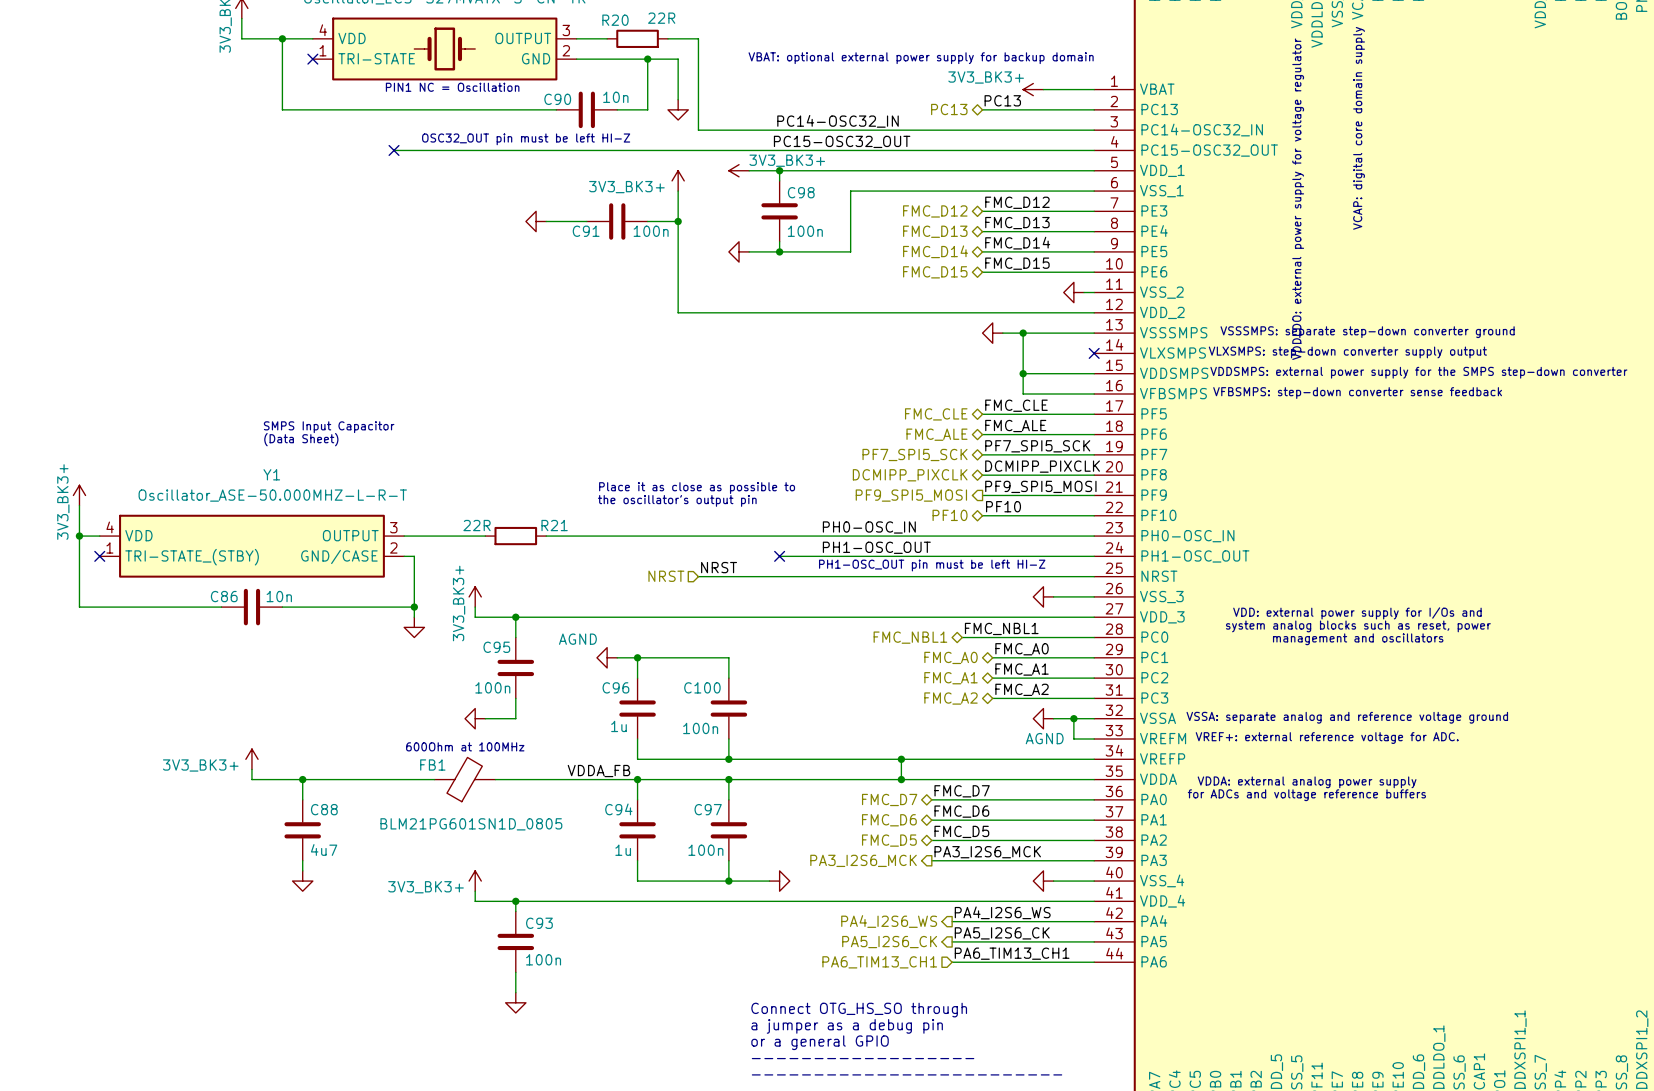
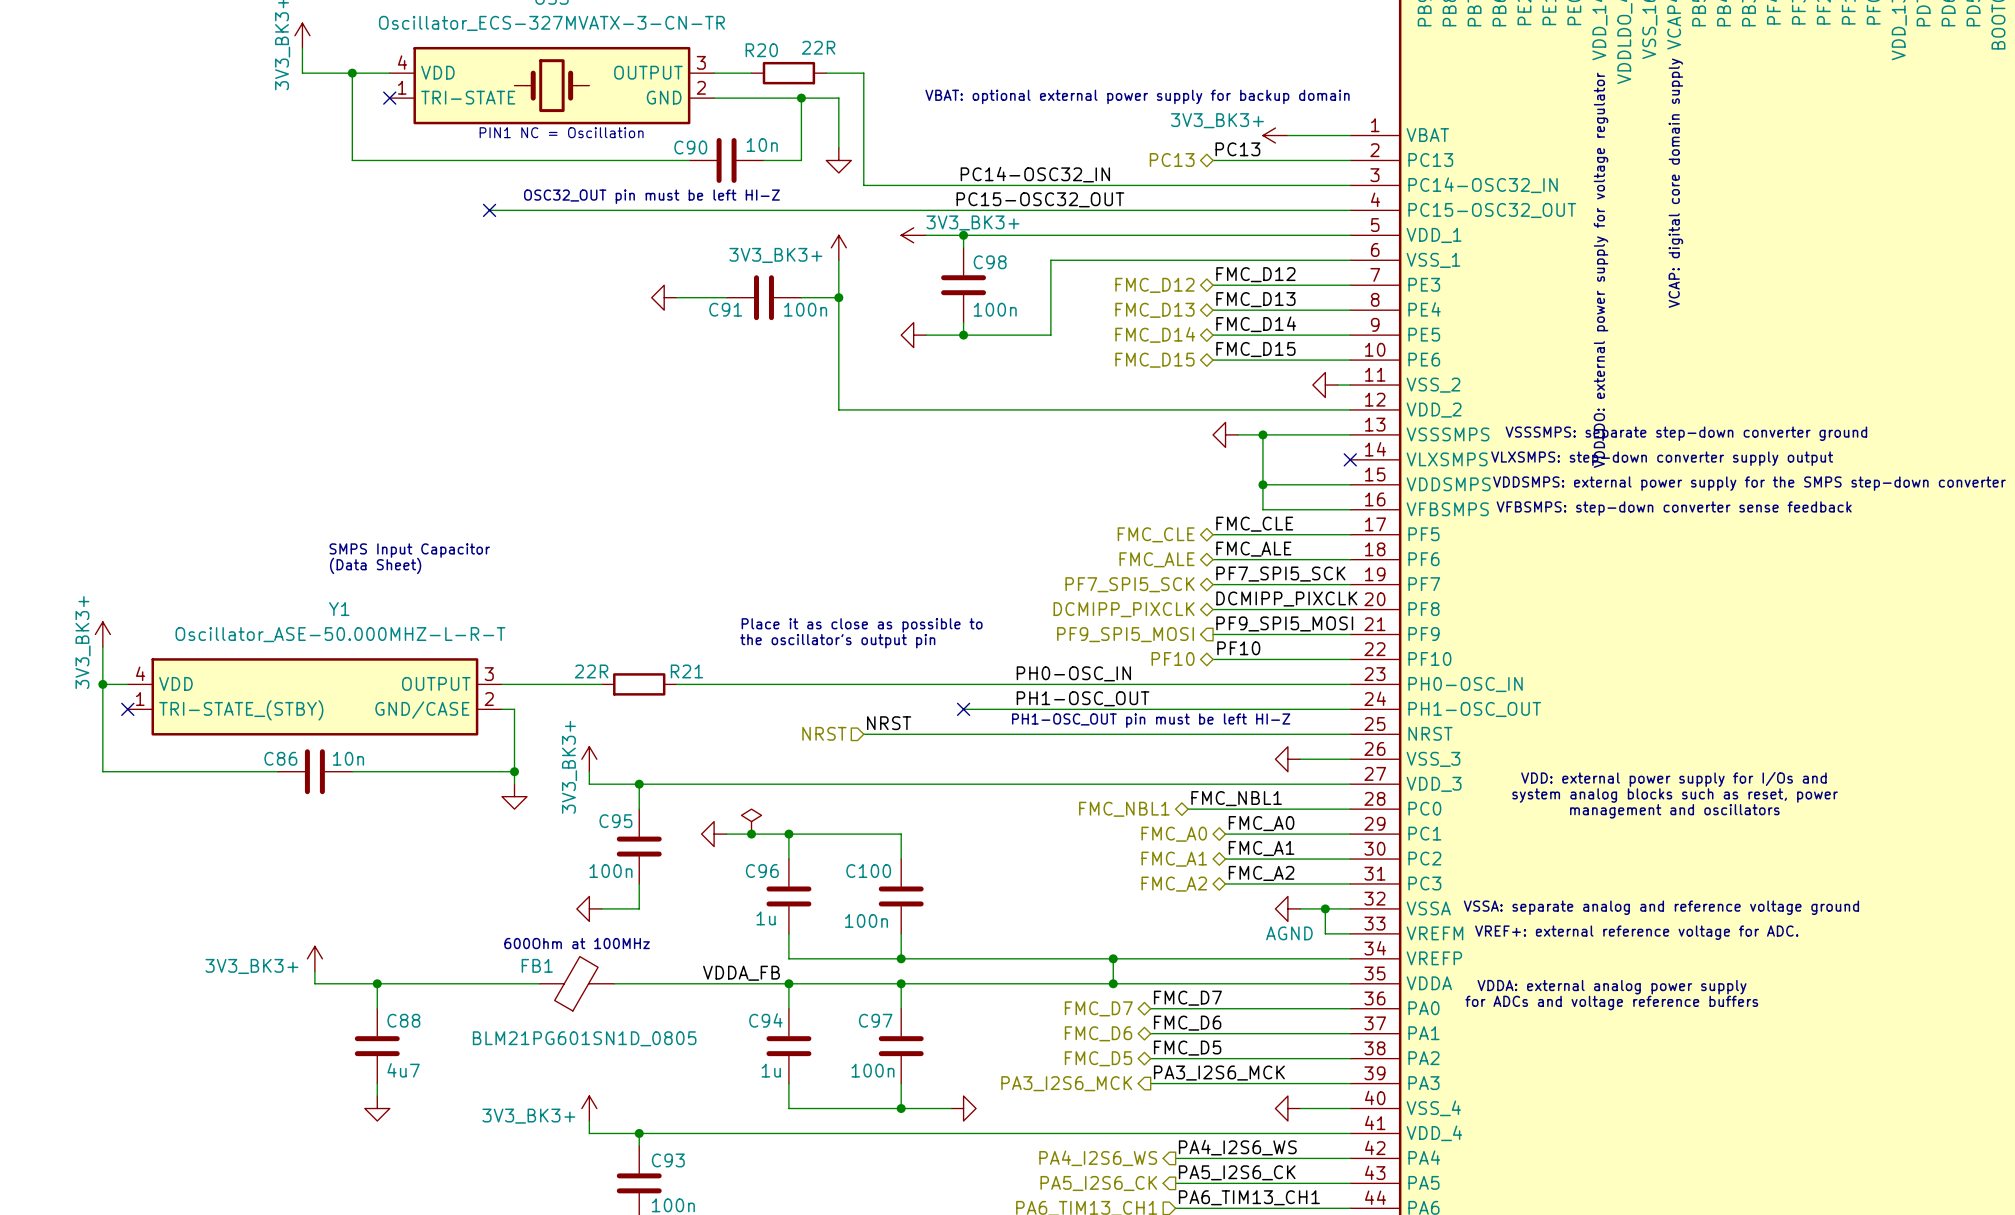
power symbol: none -> (751, 821)
power symbol: none -> (714, 834)
wire: none -> (726, 834) (763, 834)
power symbol: AGND (607, 657) -> none
junction: none -> (751, 834)

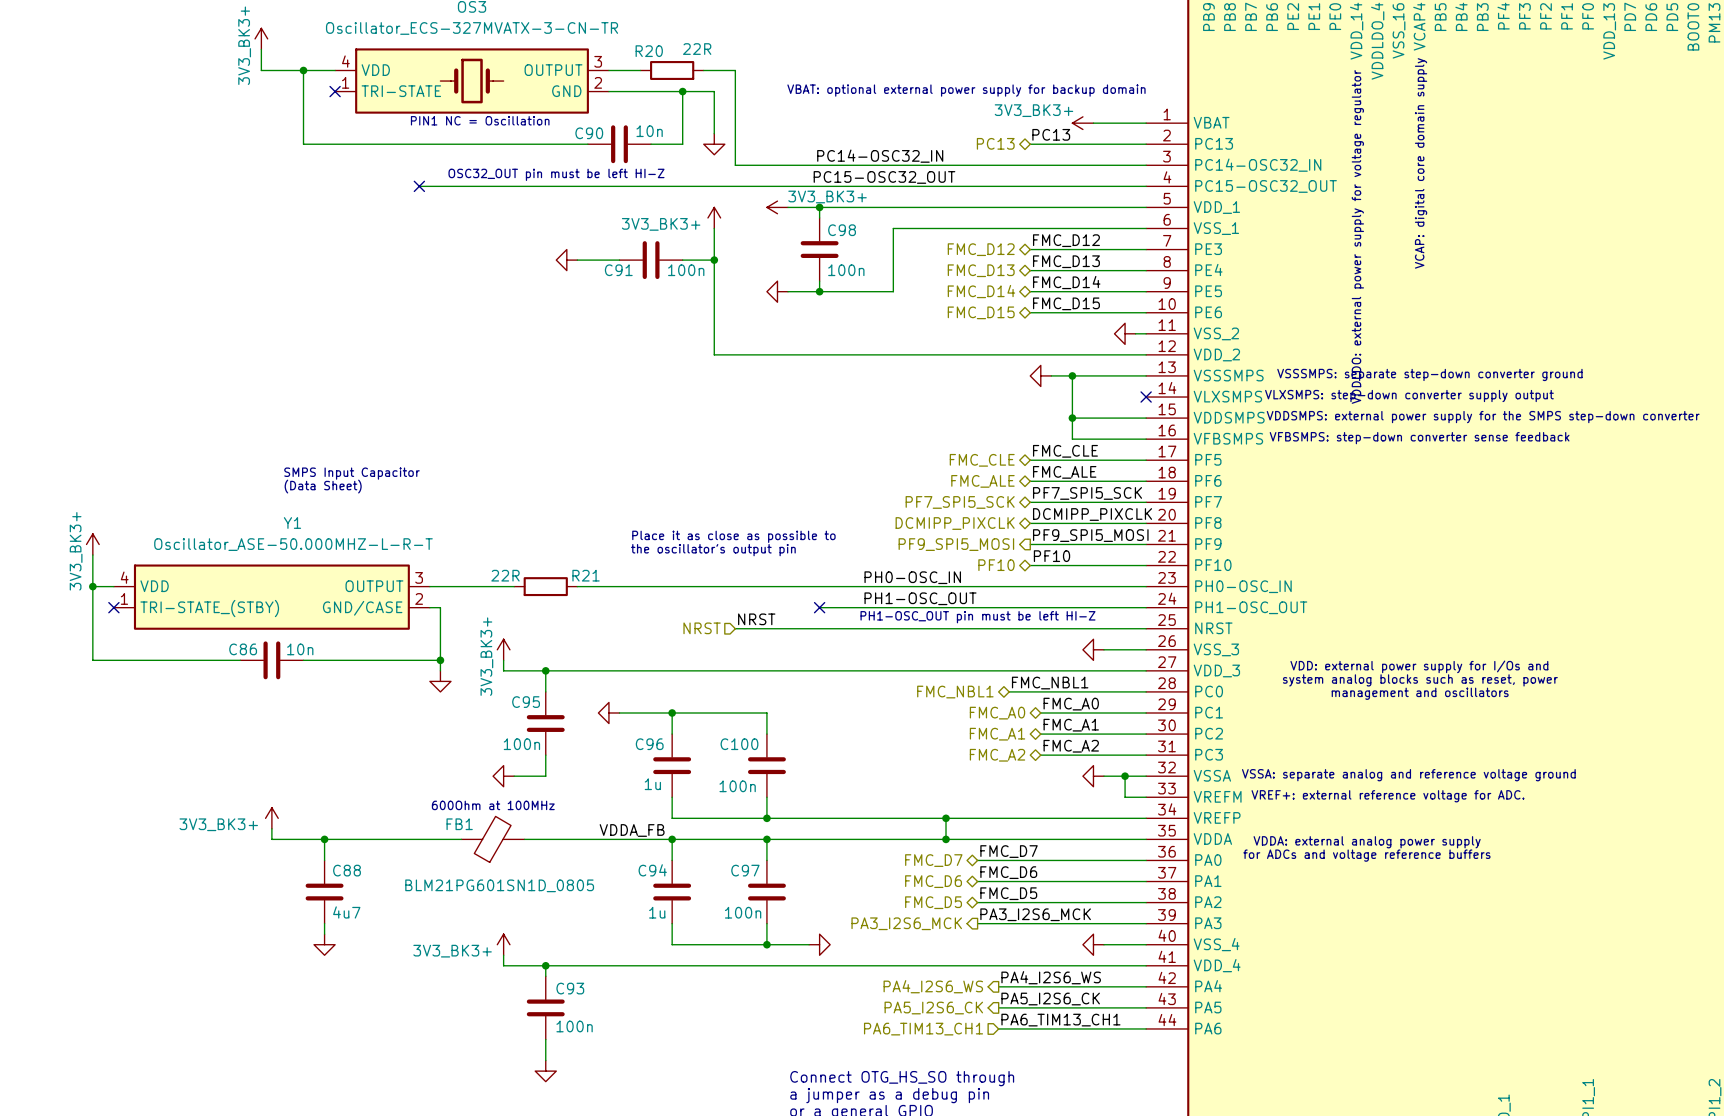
power symbol: (751, 821) -> none
junction: (751, 834) -> none
power symbol text: AGND (1289, 933) -> none

